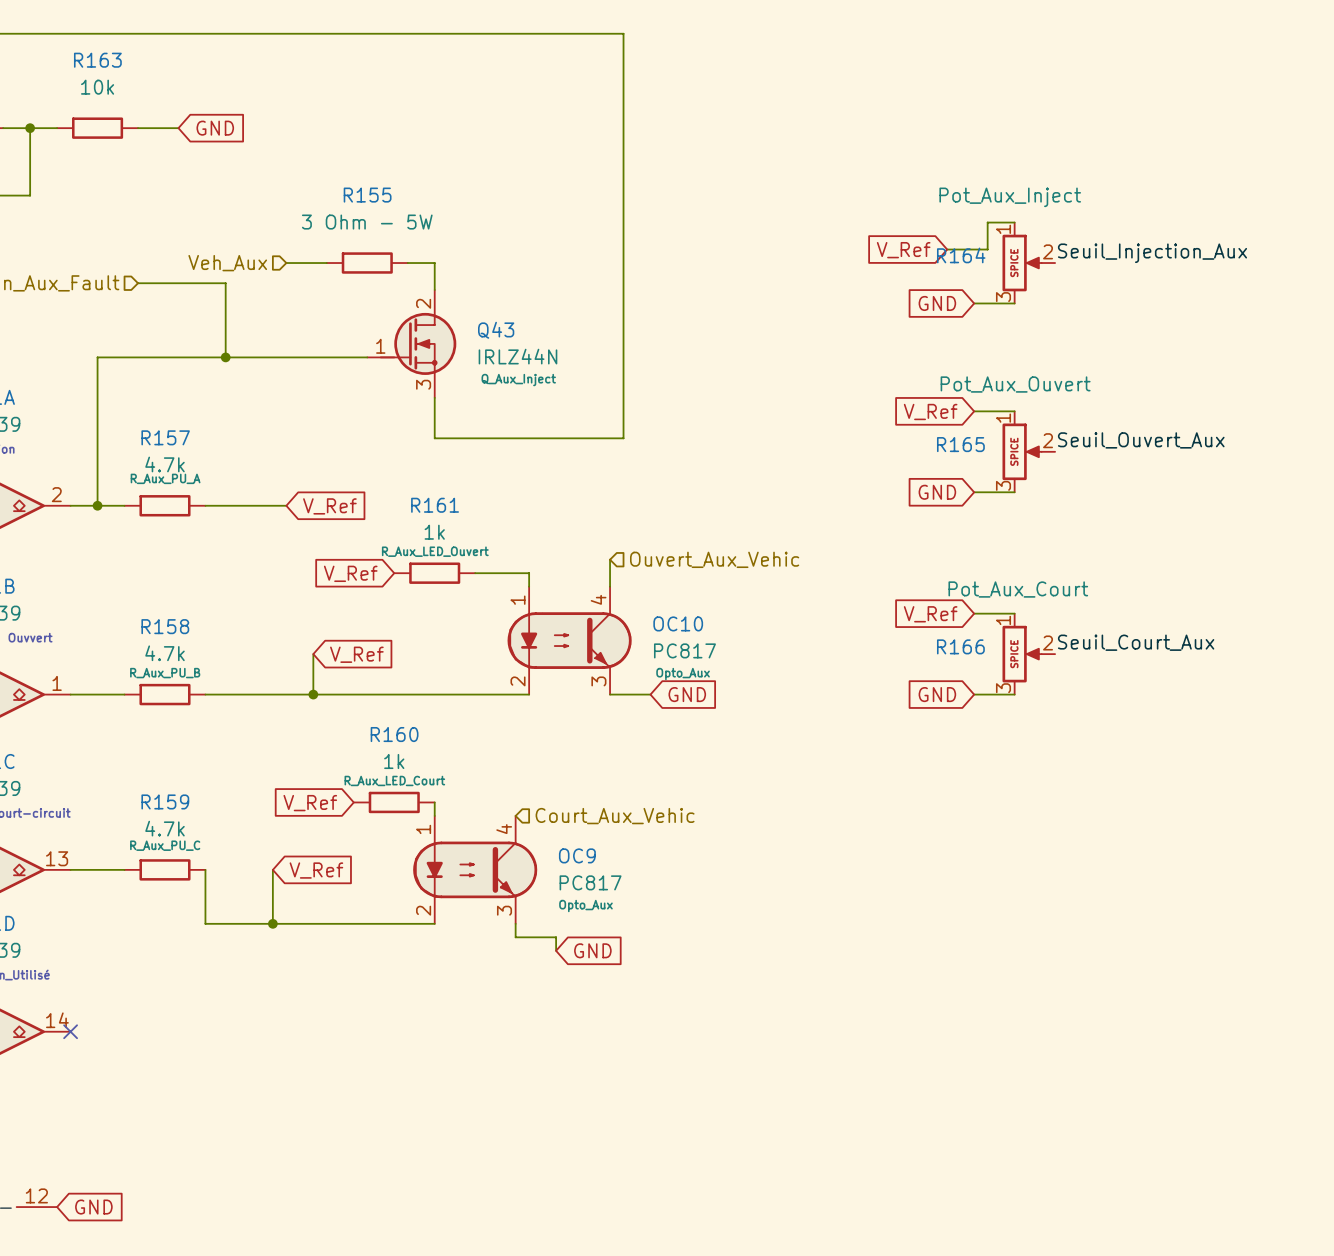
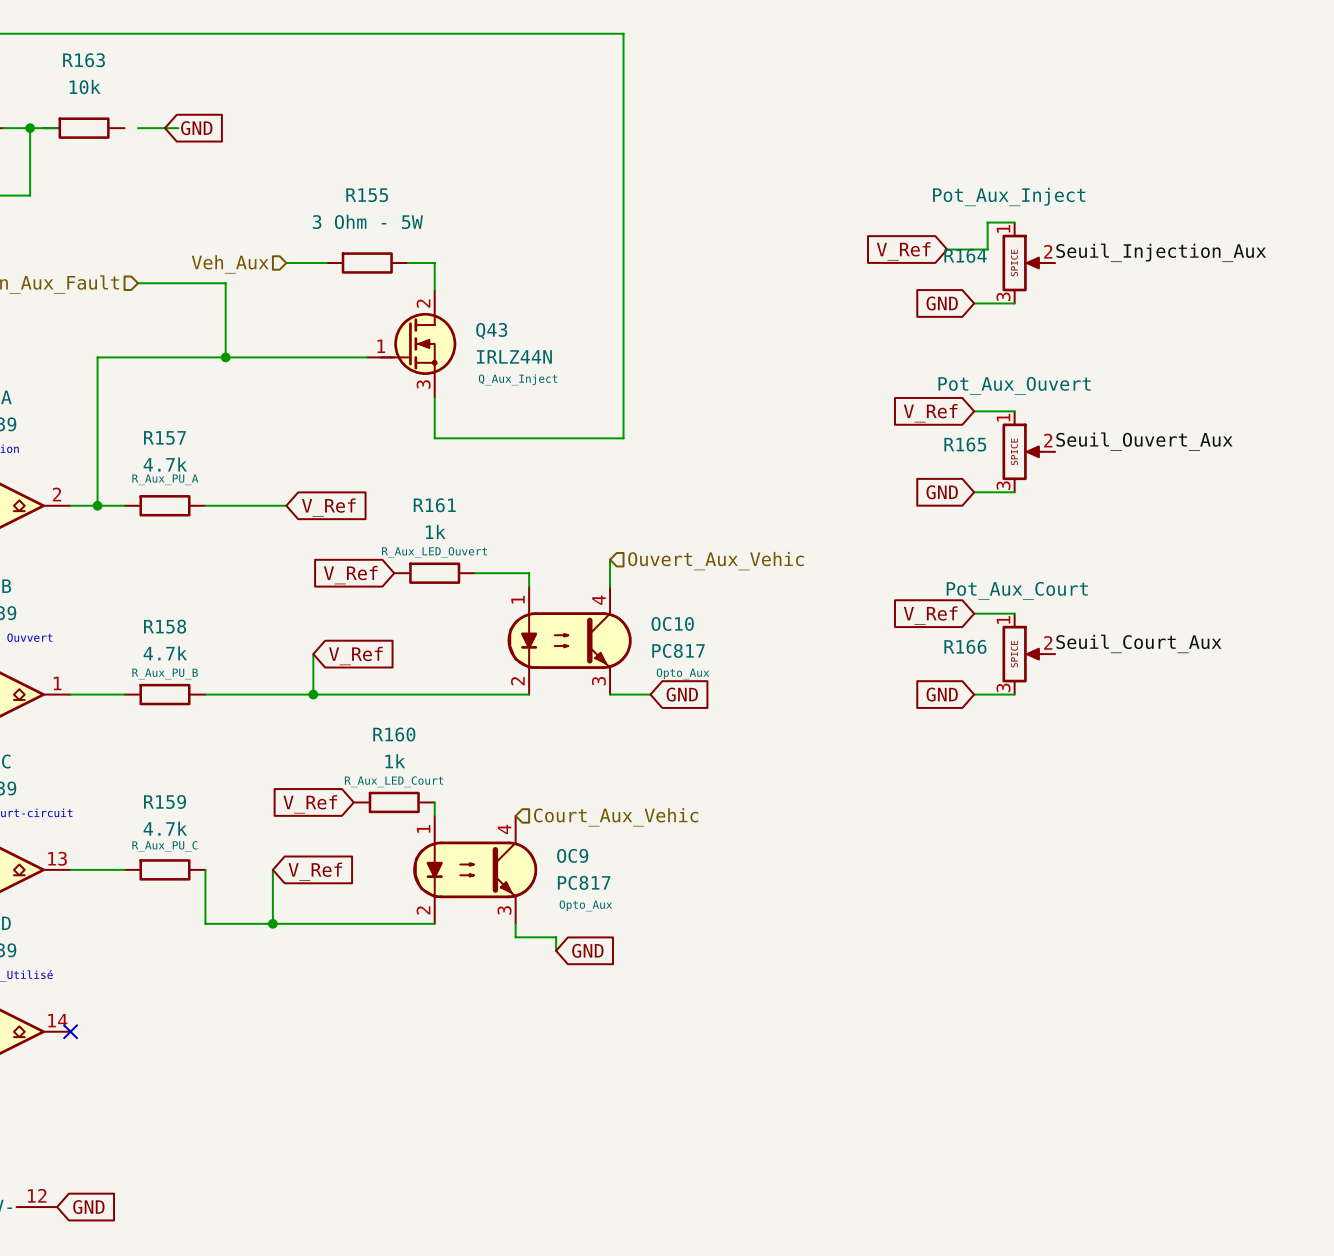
R163 position: (97, 128) -> (84, 128)
global label position: GND (215, 128) -> GND (196, 128)

